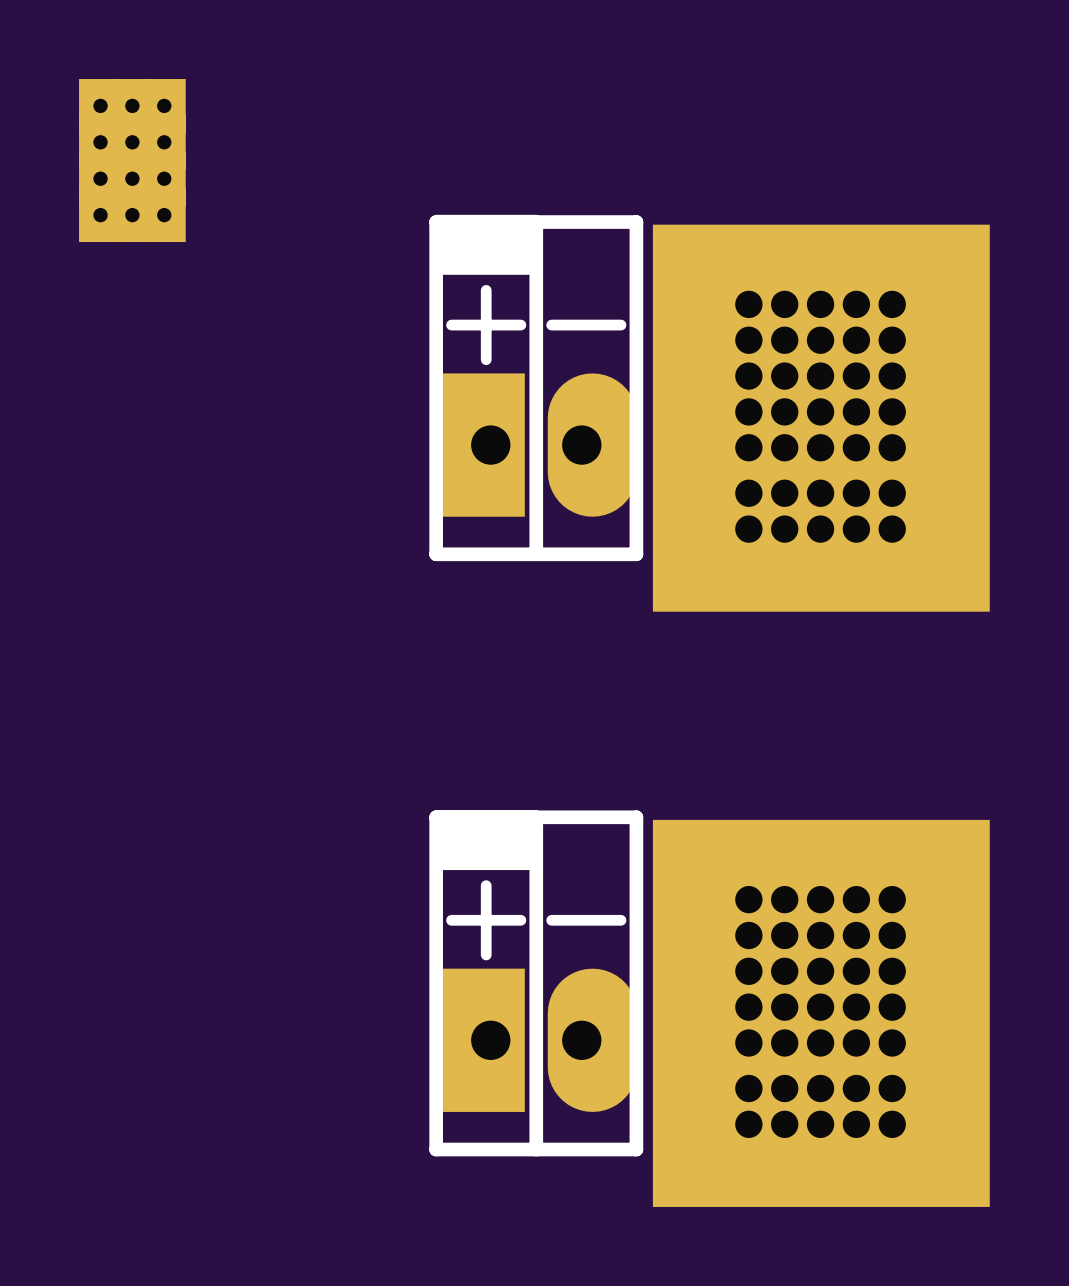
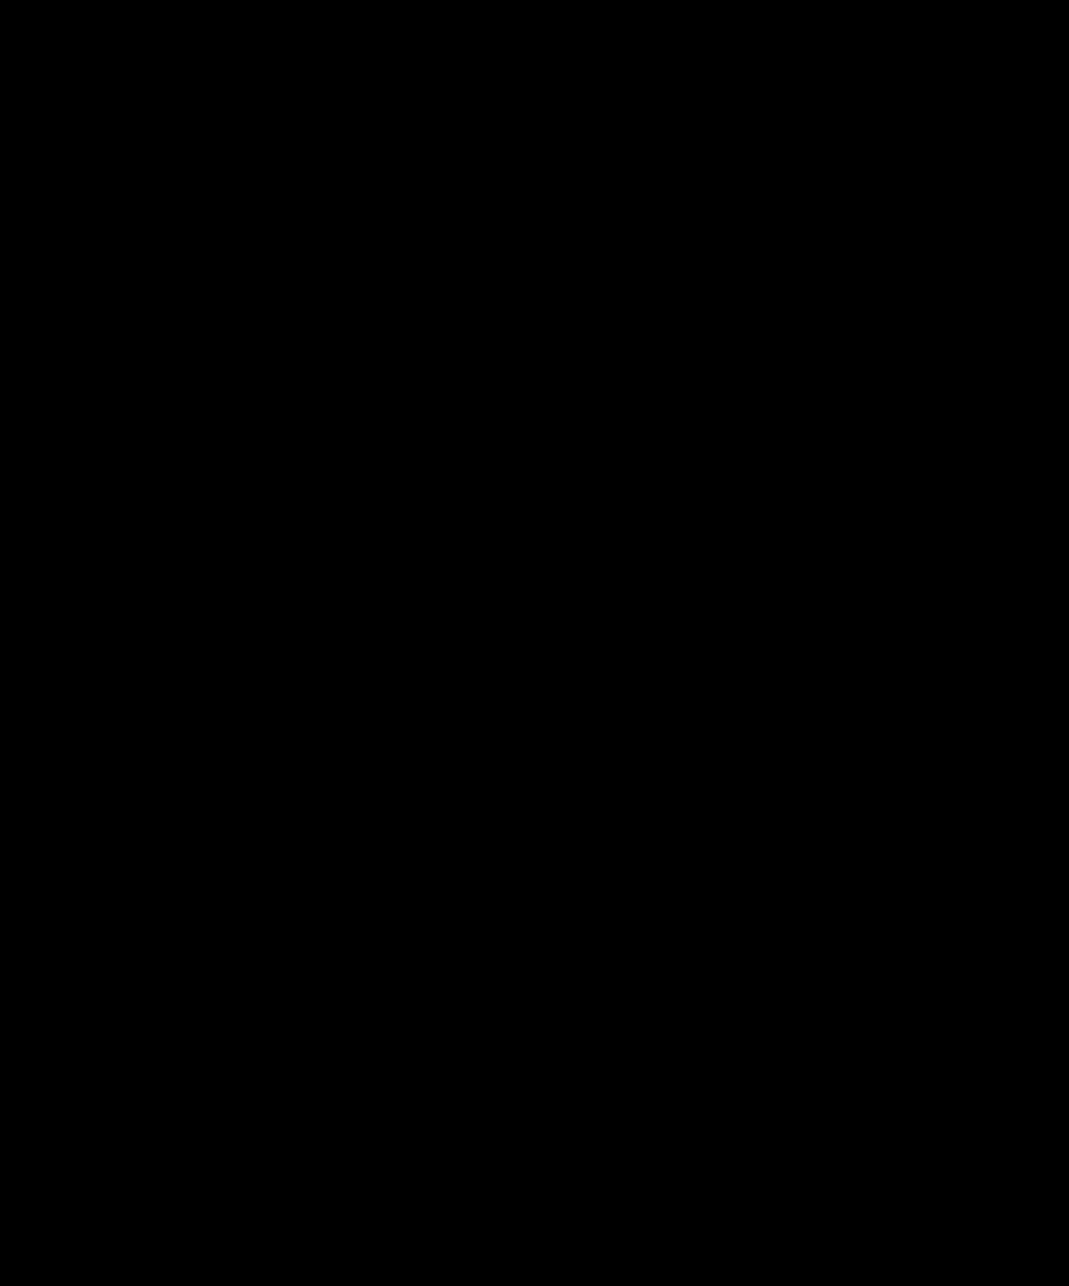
part: (132, 160) -> none
part: (536, 387) -> none
part: (821, 418) -> none
part: (536, 983) -> none
part: (821, 1013) -> none

